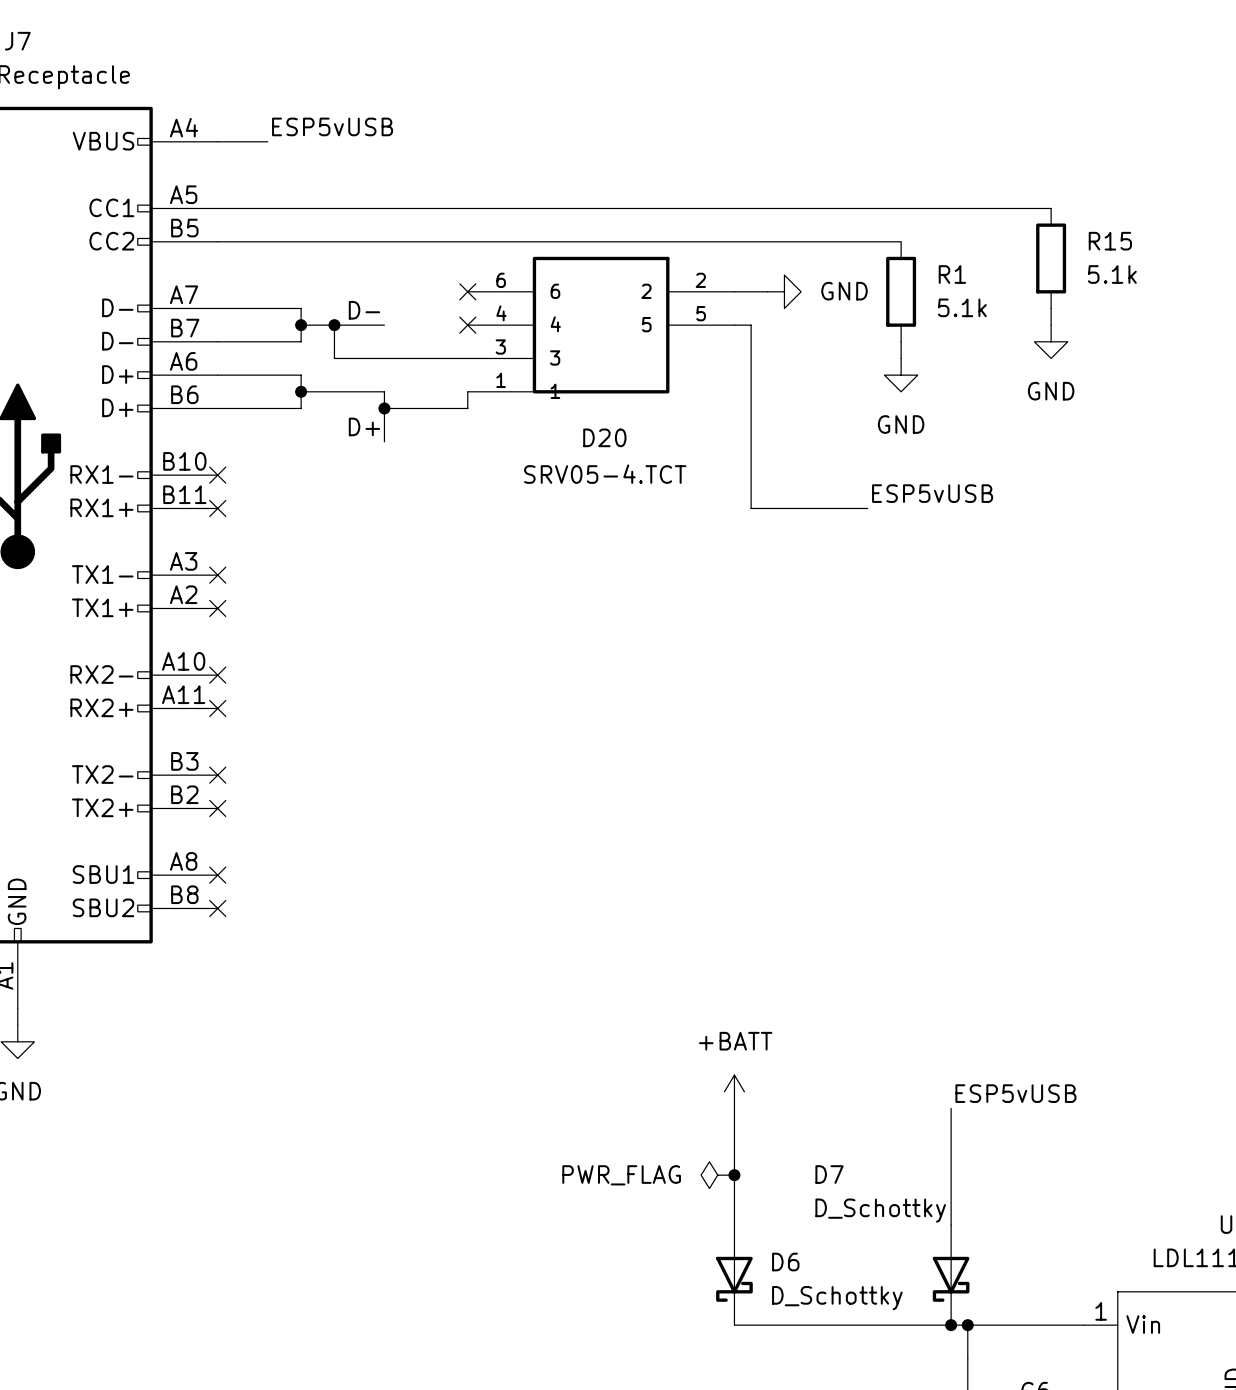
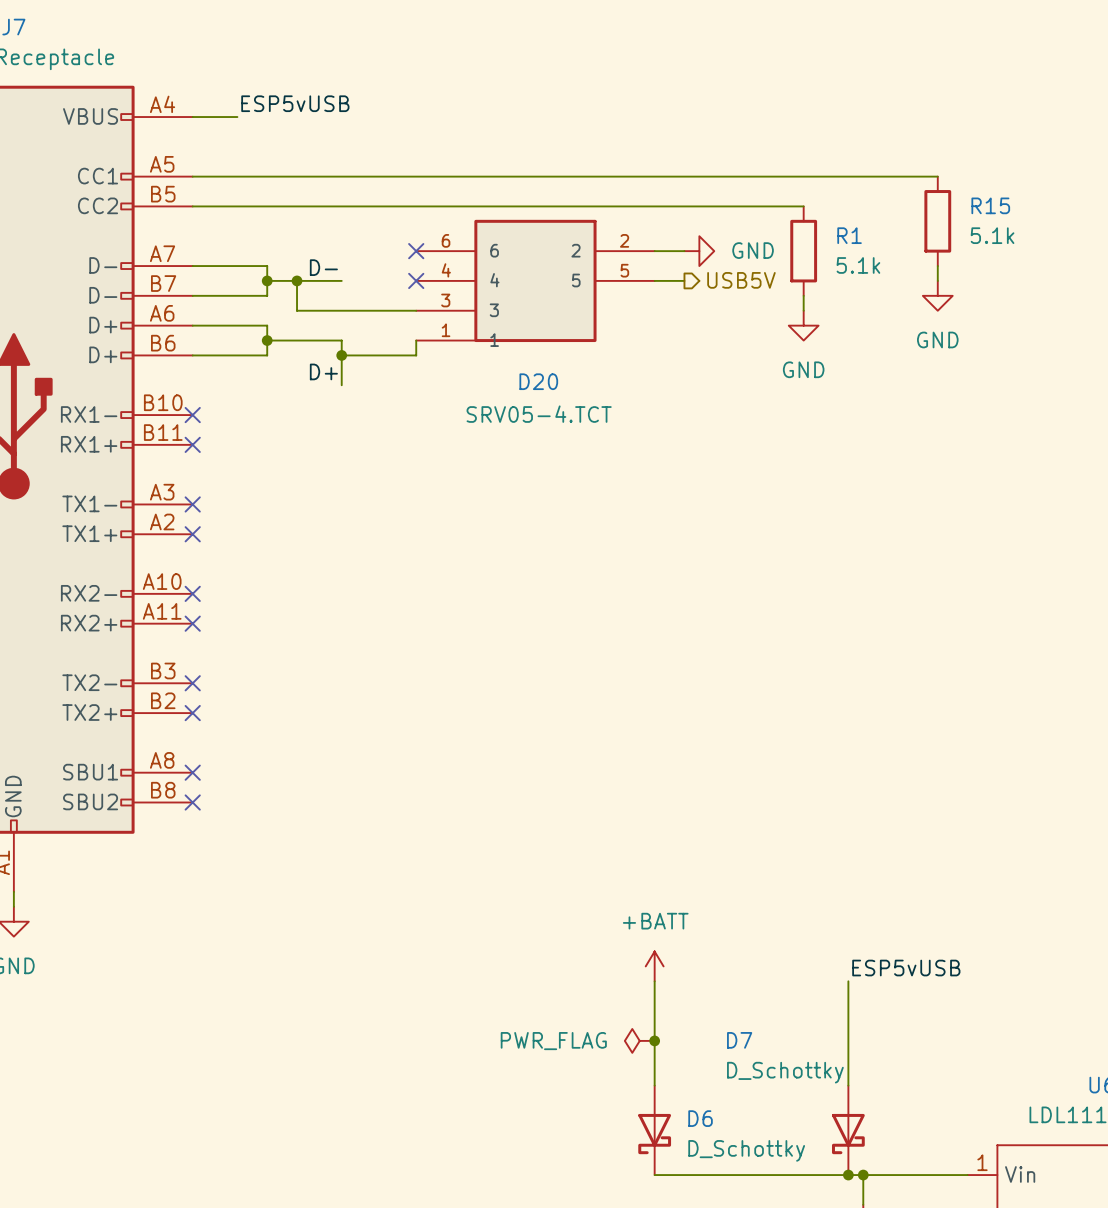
hierarchical label: none -> USB5V (741, 280)
wire: (751, 325) (751, 508) (867, 508) -> (669, 280) (684, 280)
label: ESP5vUSB (932, 493) -> none

